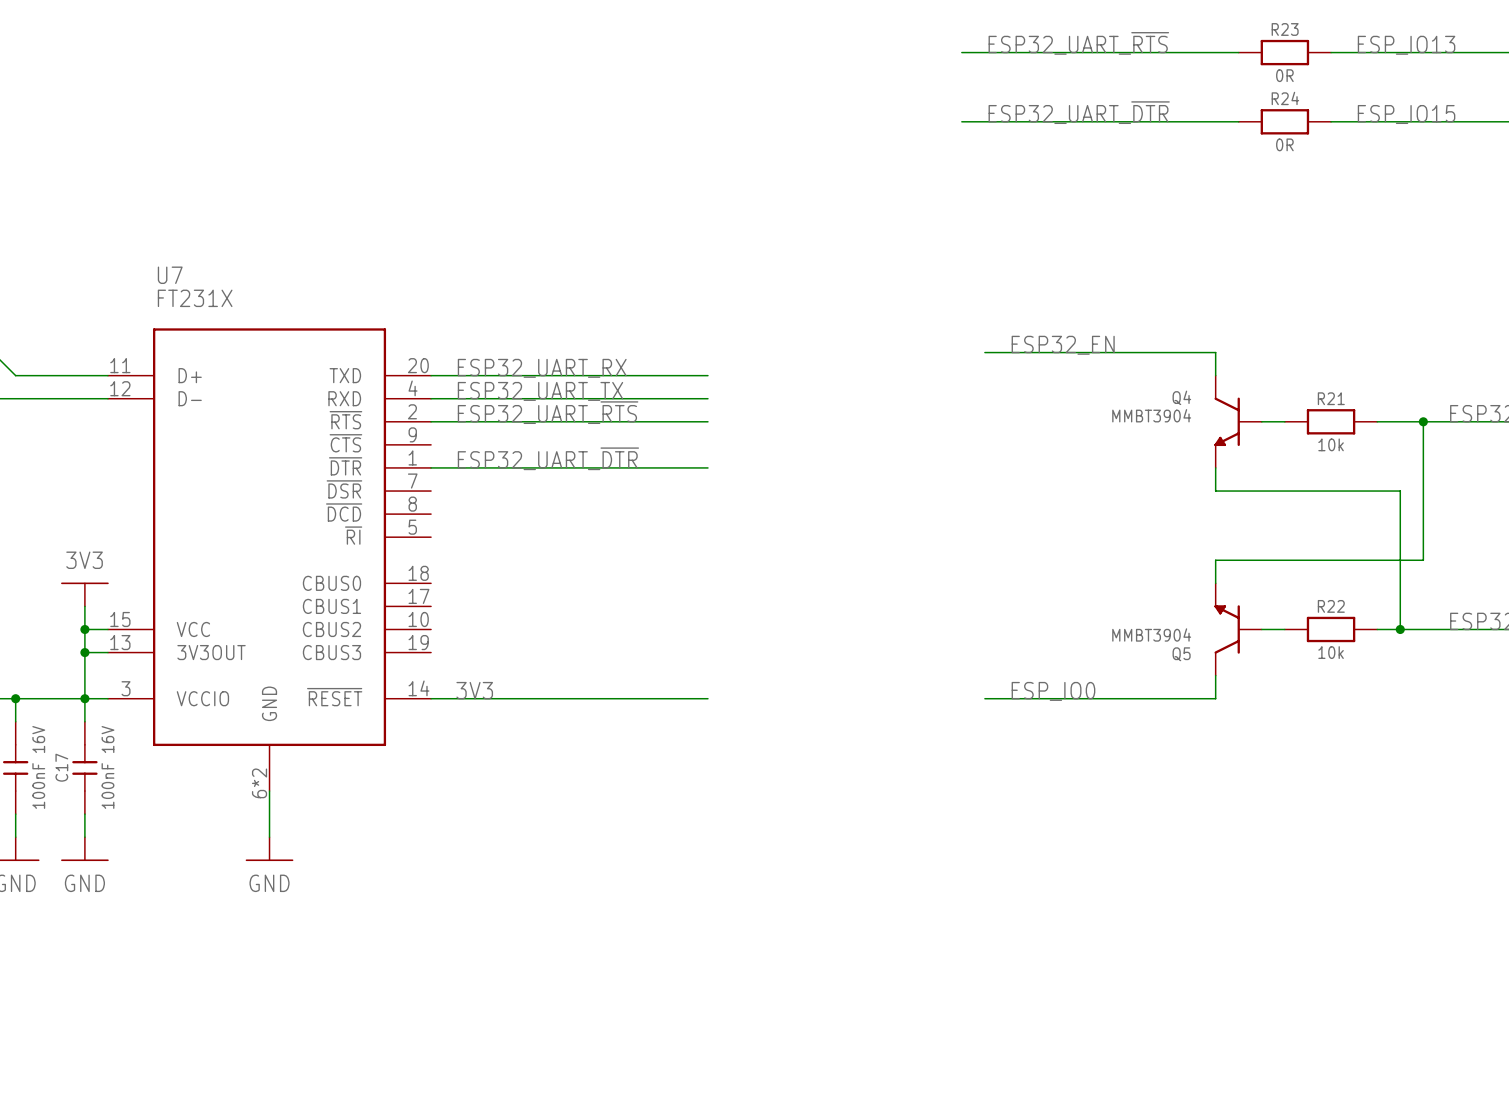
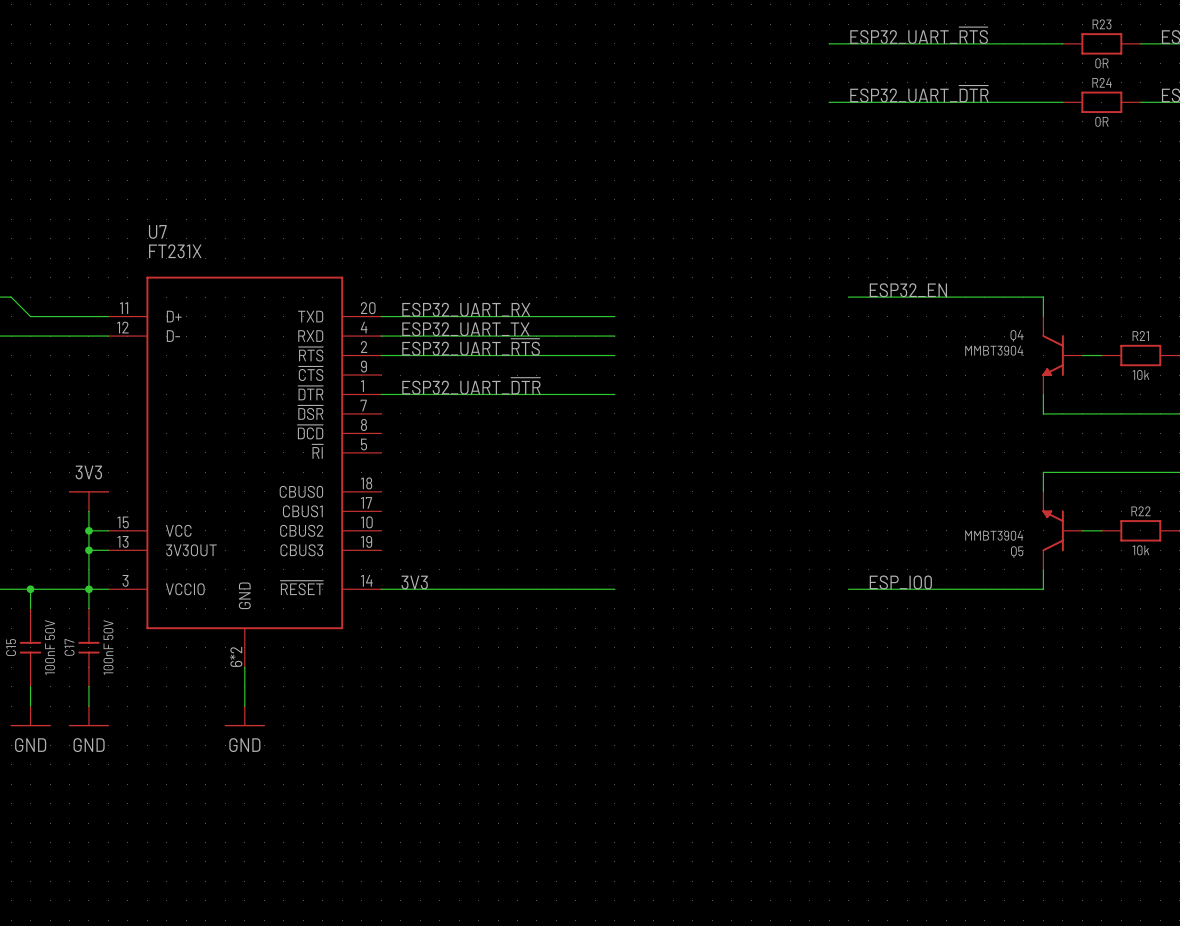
C15 value: 100nF 16V (38, 767) -> 100nF 50V (50, 647)
C17 value: 100nF 16V (107, 767) -> 100nF 50V (108, 647)

